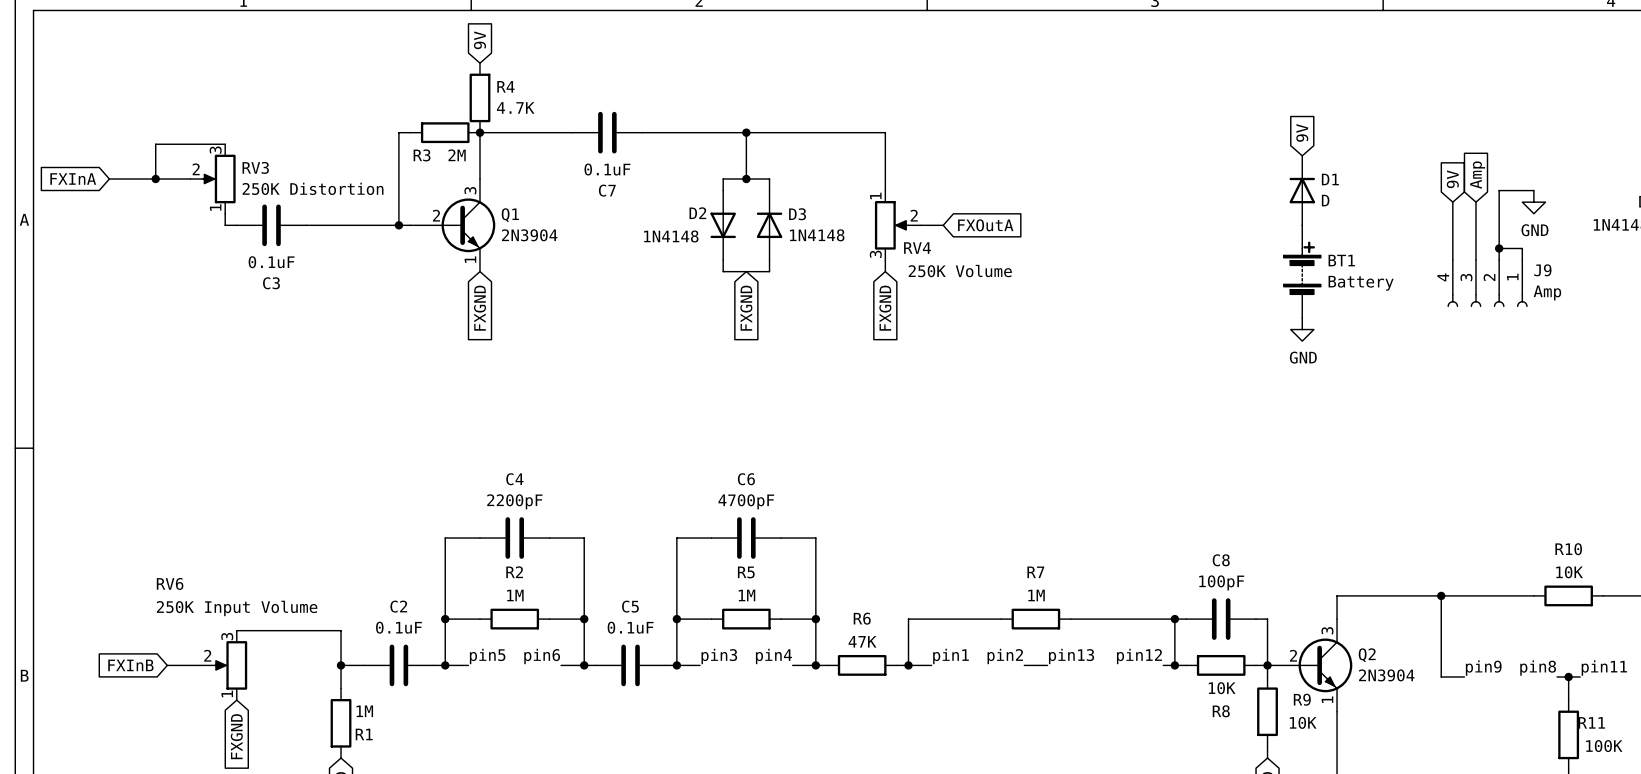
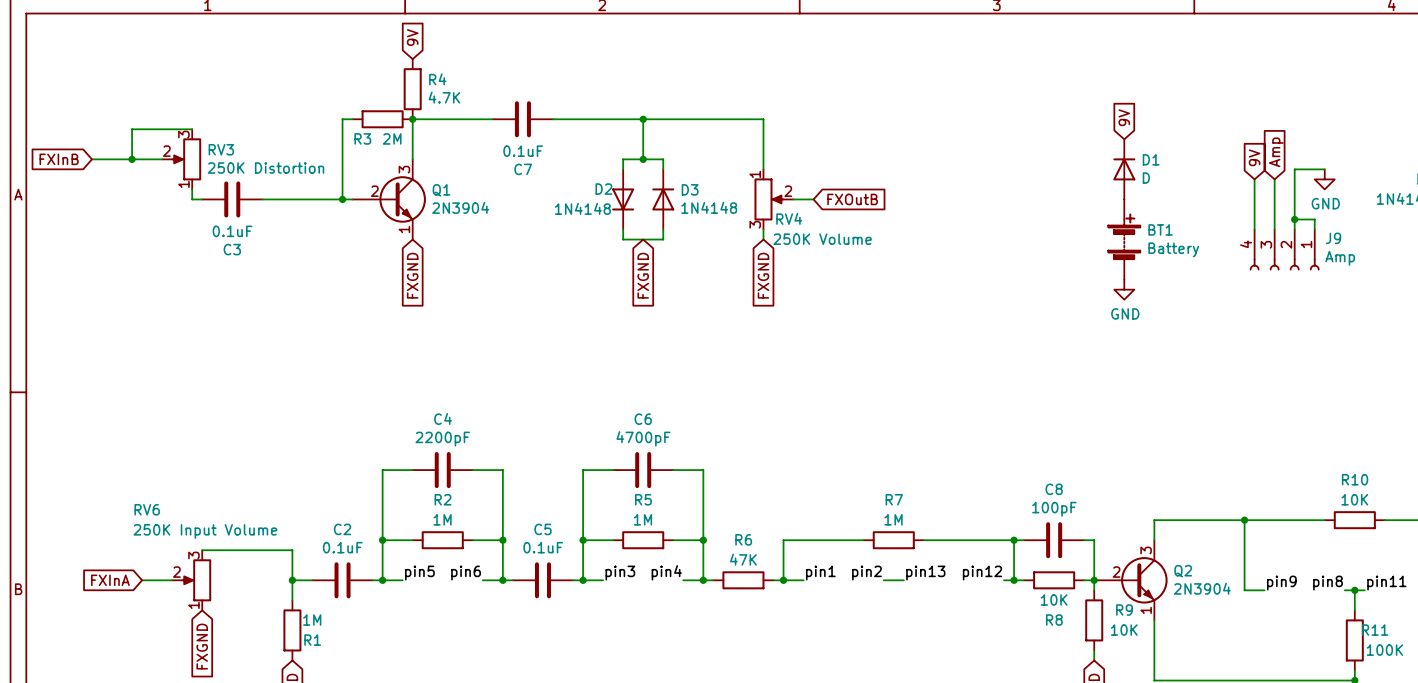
global label: FXInA (73, 178) -> FXInB (59, 159)
global label: FXOutA (985, 225) -> FXOutB (852, 199)
global label: FXInB (130, 665) -> FXInA (110, 580)

